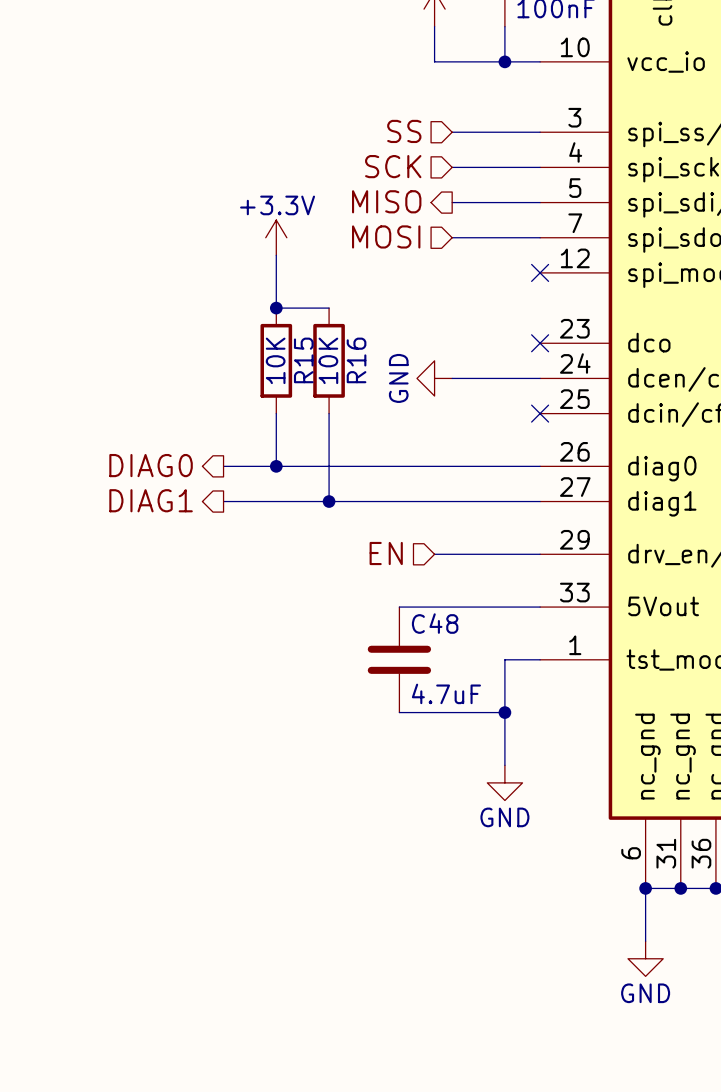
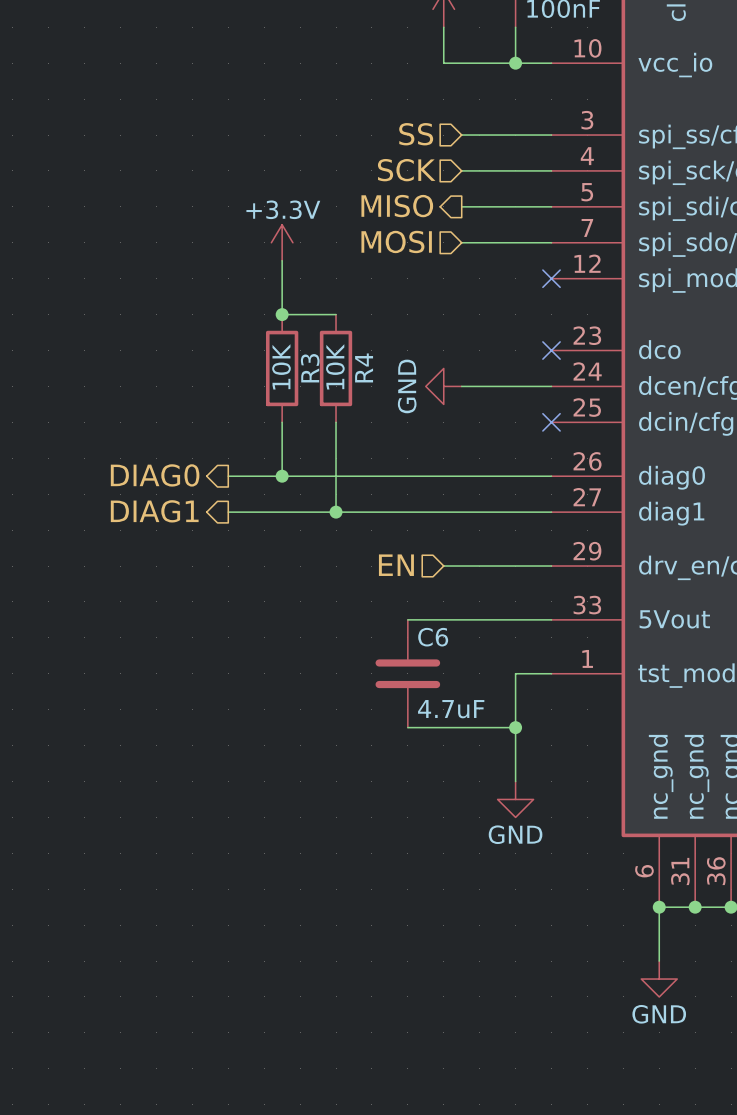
R15 name: R15 (303, 360) -> R3 (310, 368)
R16 name: R16 (356, 360) -> R4 (364, 367)
C48 name: C48 (435, 623) -> C6 (433, 637)

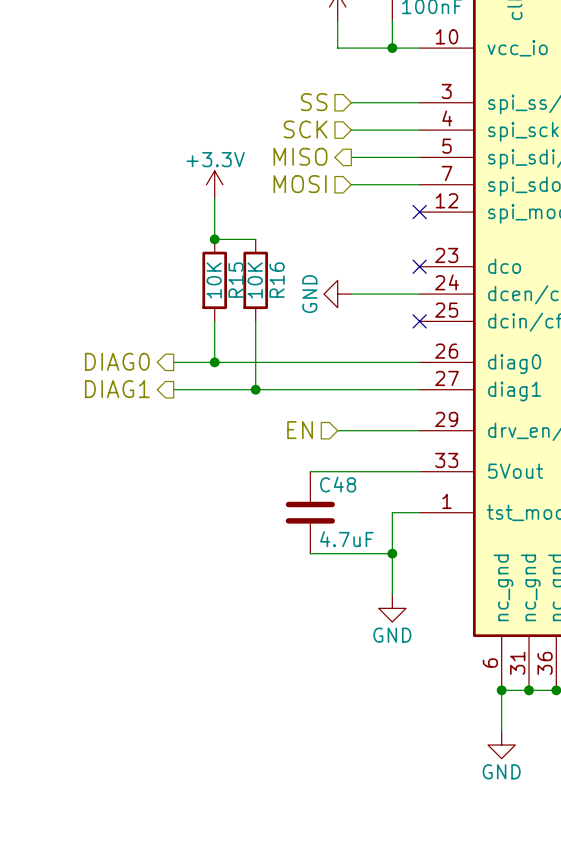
R4 name: R4 (364, 367) -> R16 (277, 280)
R3 name: R3 (310, 368) -> R15 (236, 280)
C6 name: C6 (433, 637) -> C48 (338, 484)

